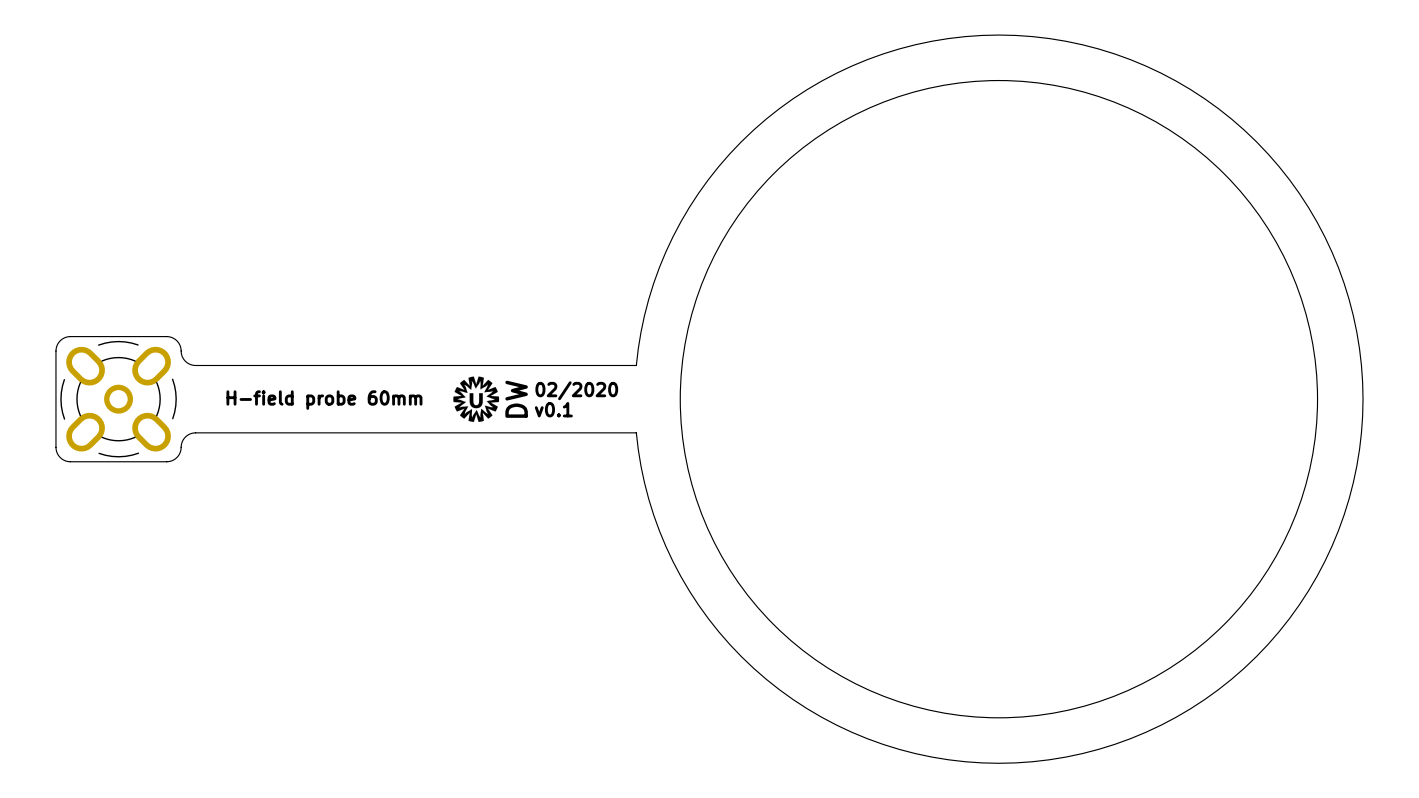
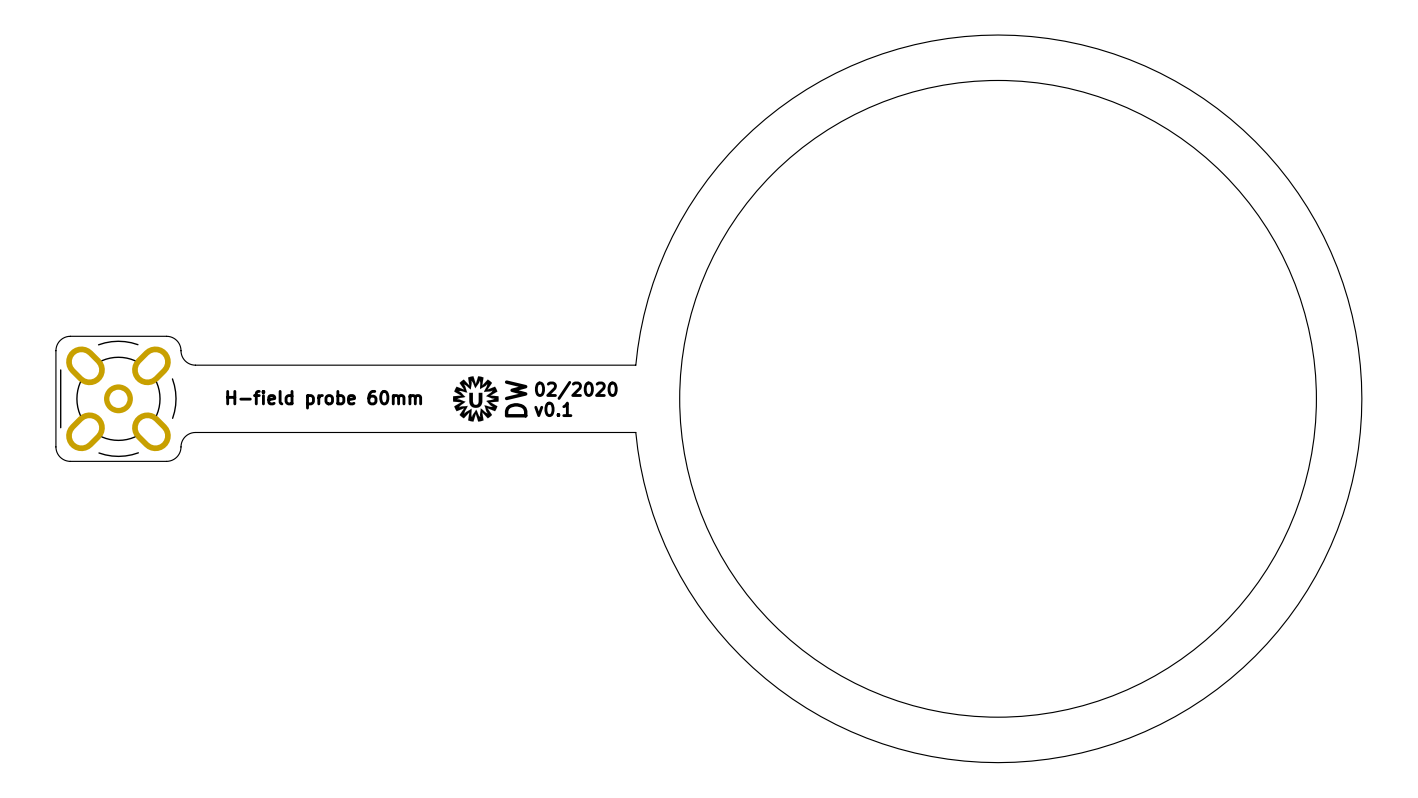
part footprint: [60, 340, 177, 458] -> [60, 340, 177, 458]

